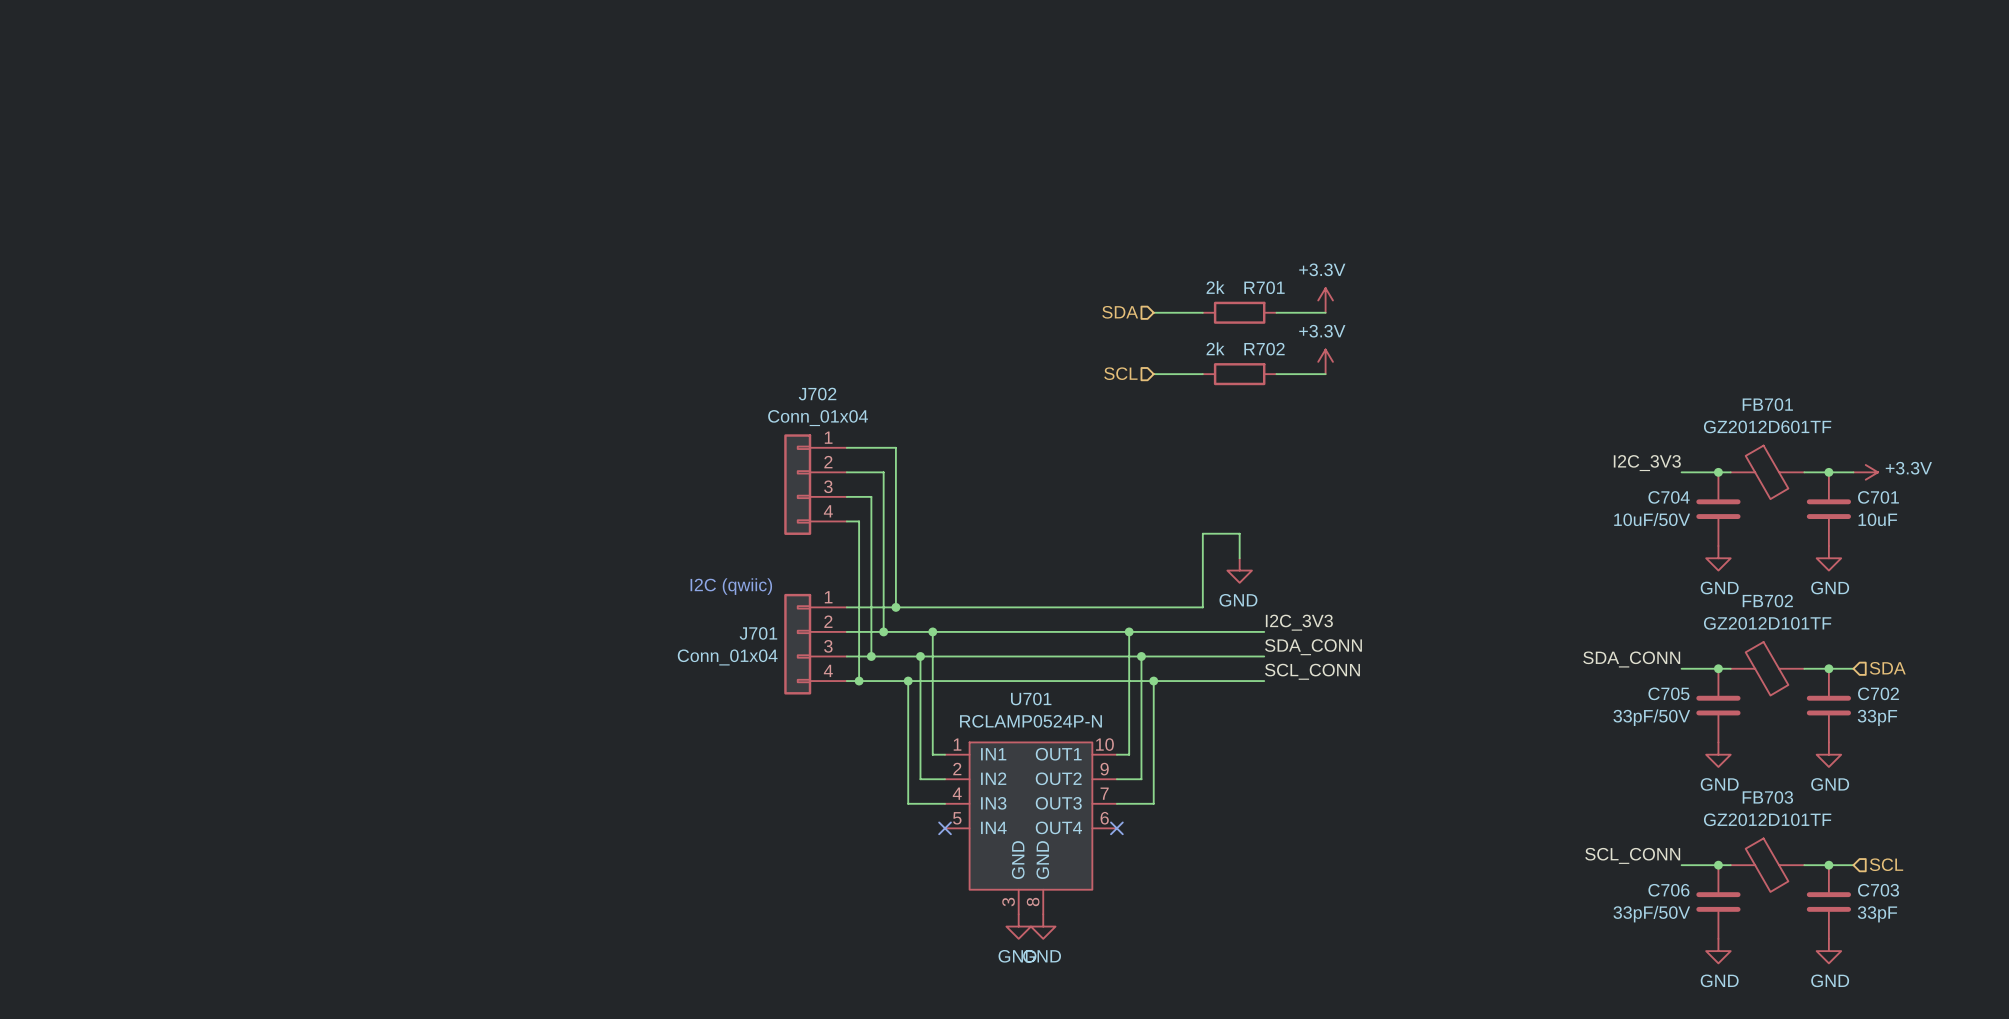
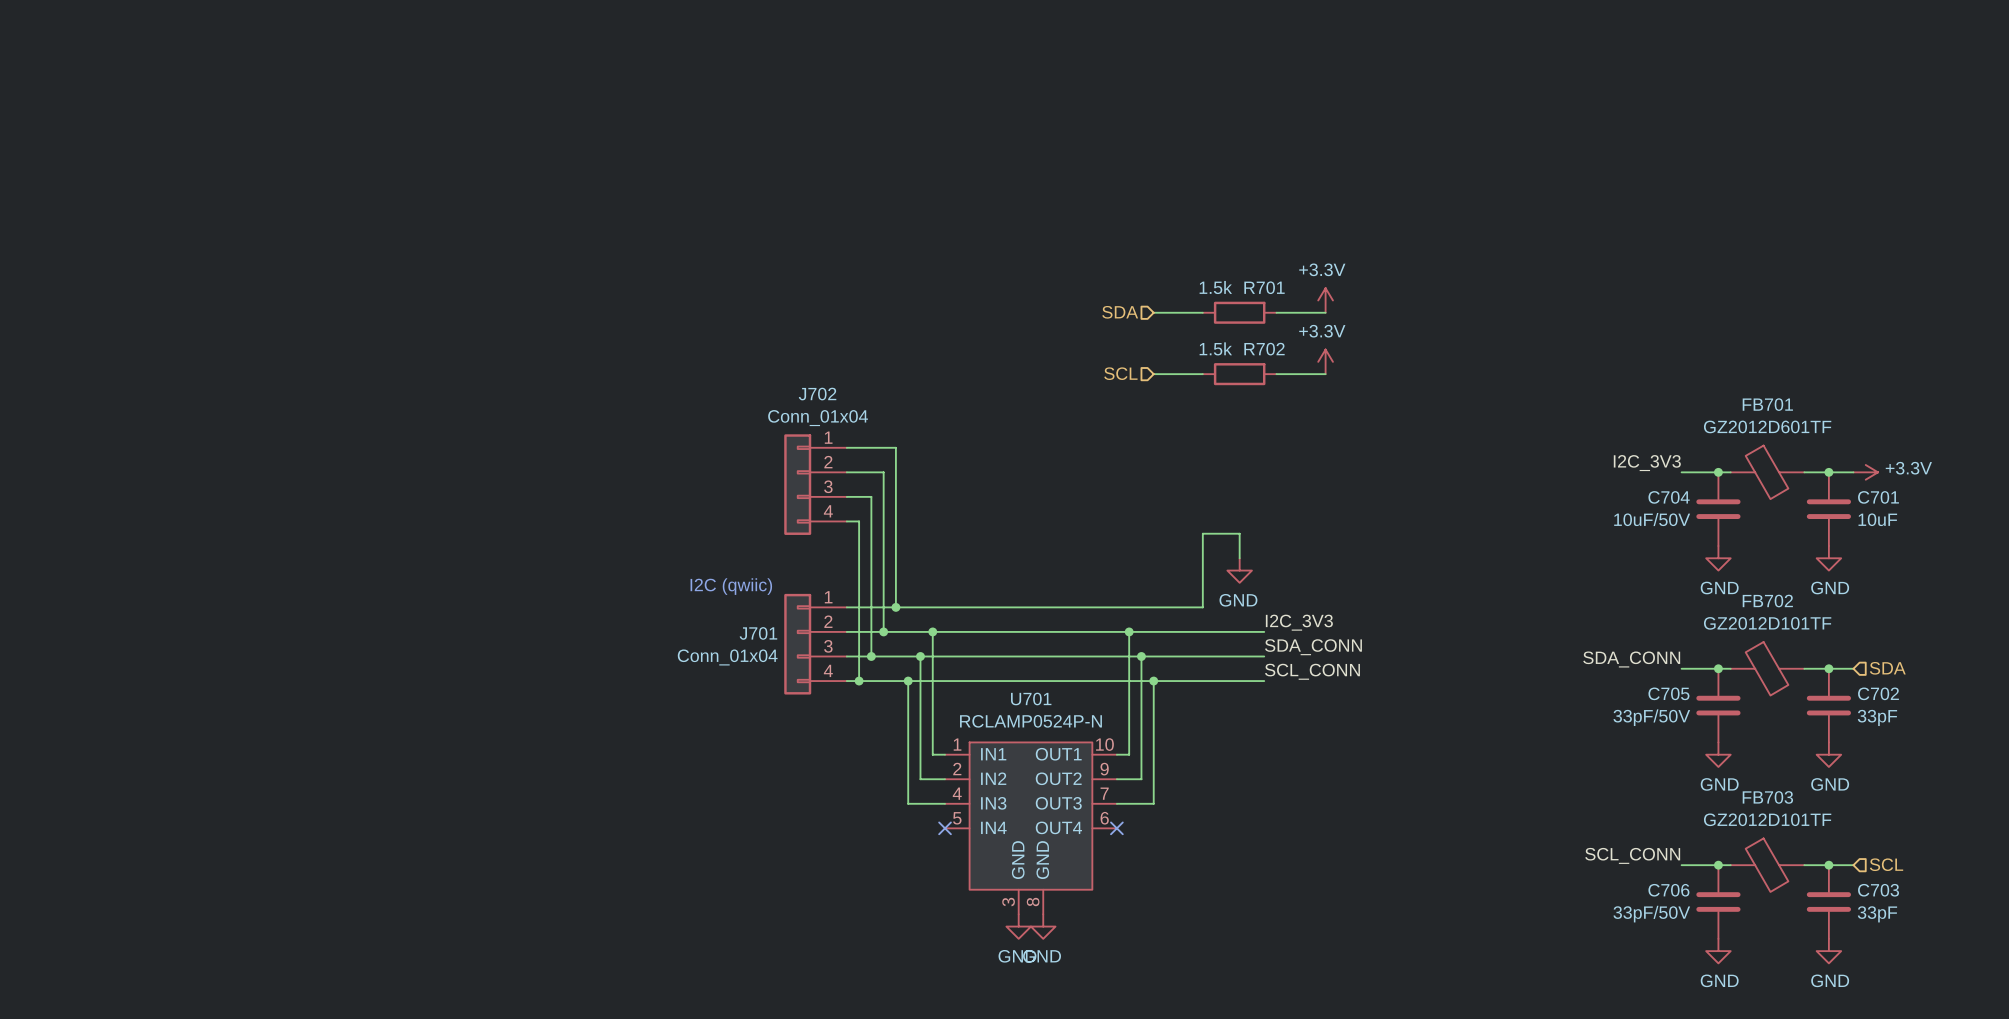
R701 value: 2k (1215, 287) -> 1.5k (1215, 287)
R702 value: 2k (1215, 348) -> 1.5k (1215, 348)

